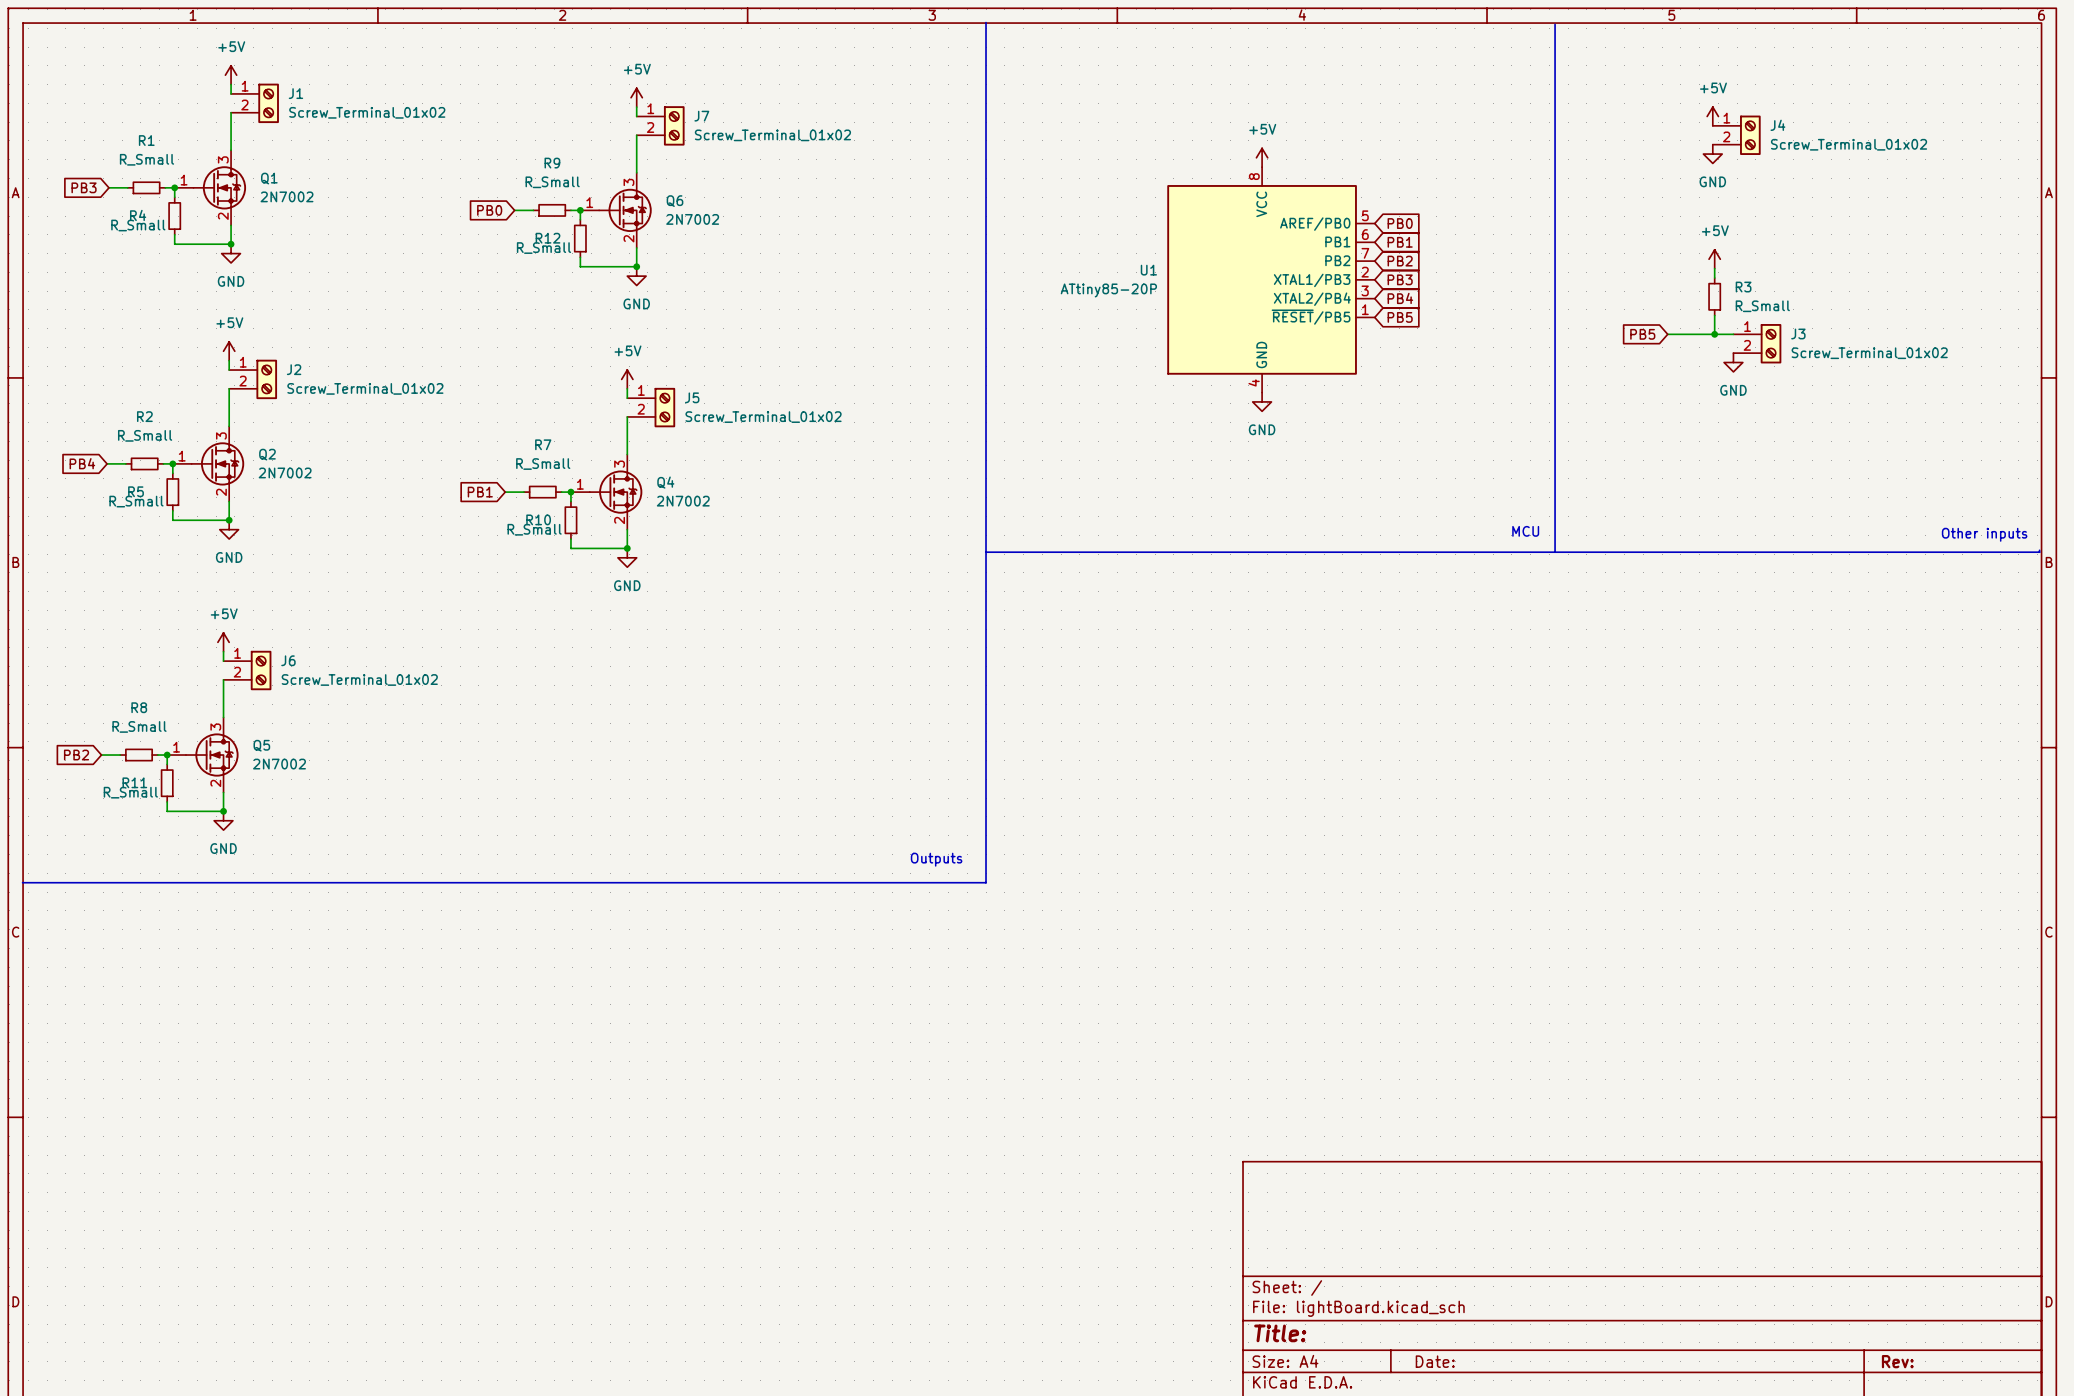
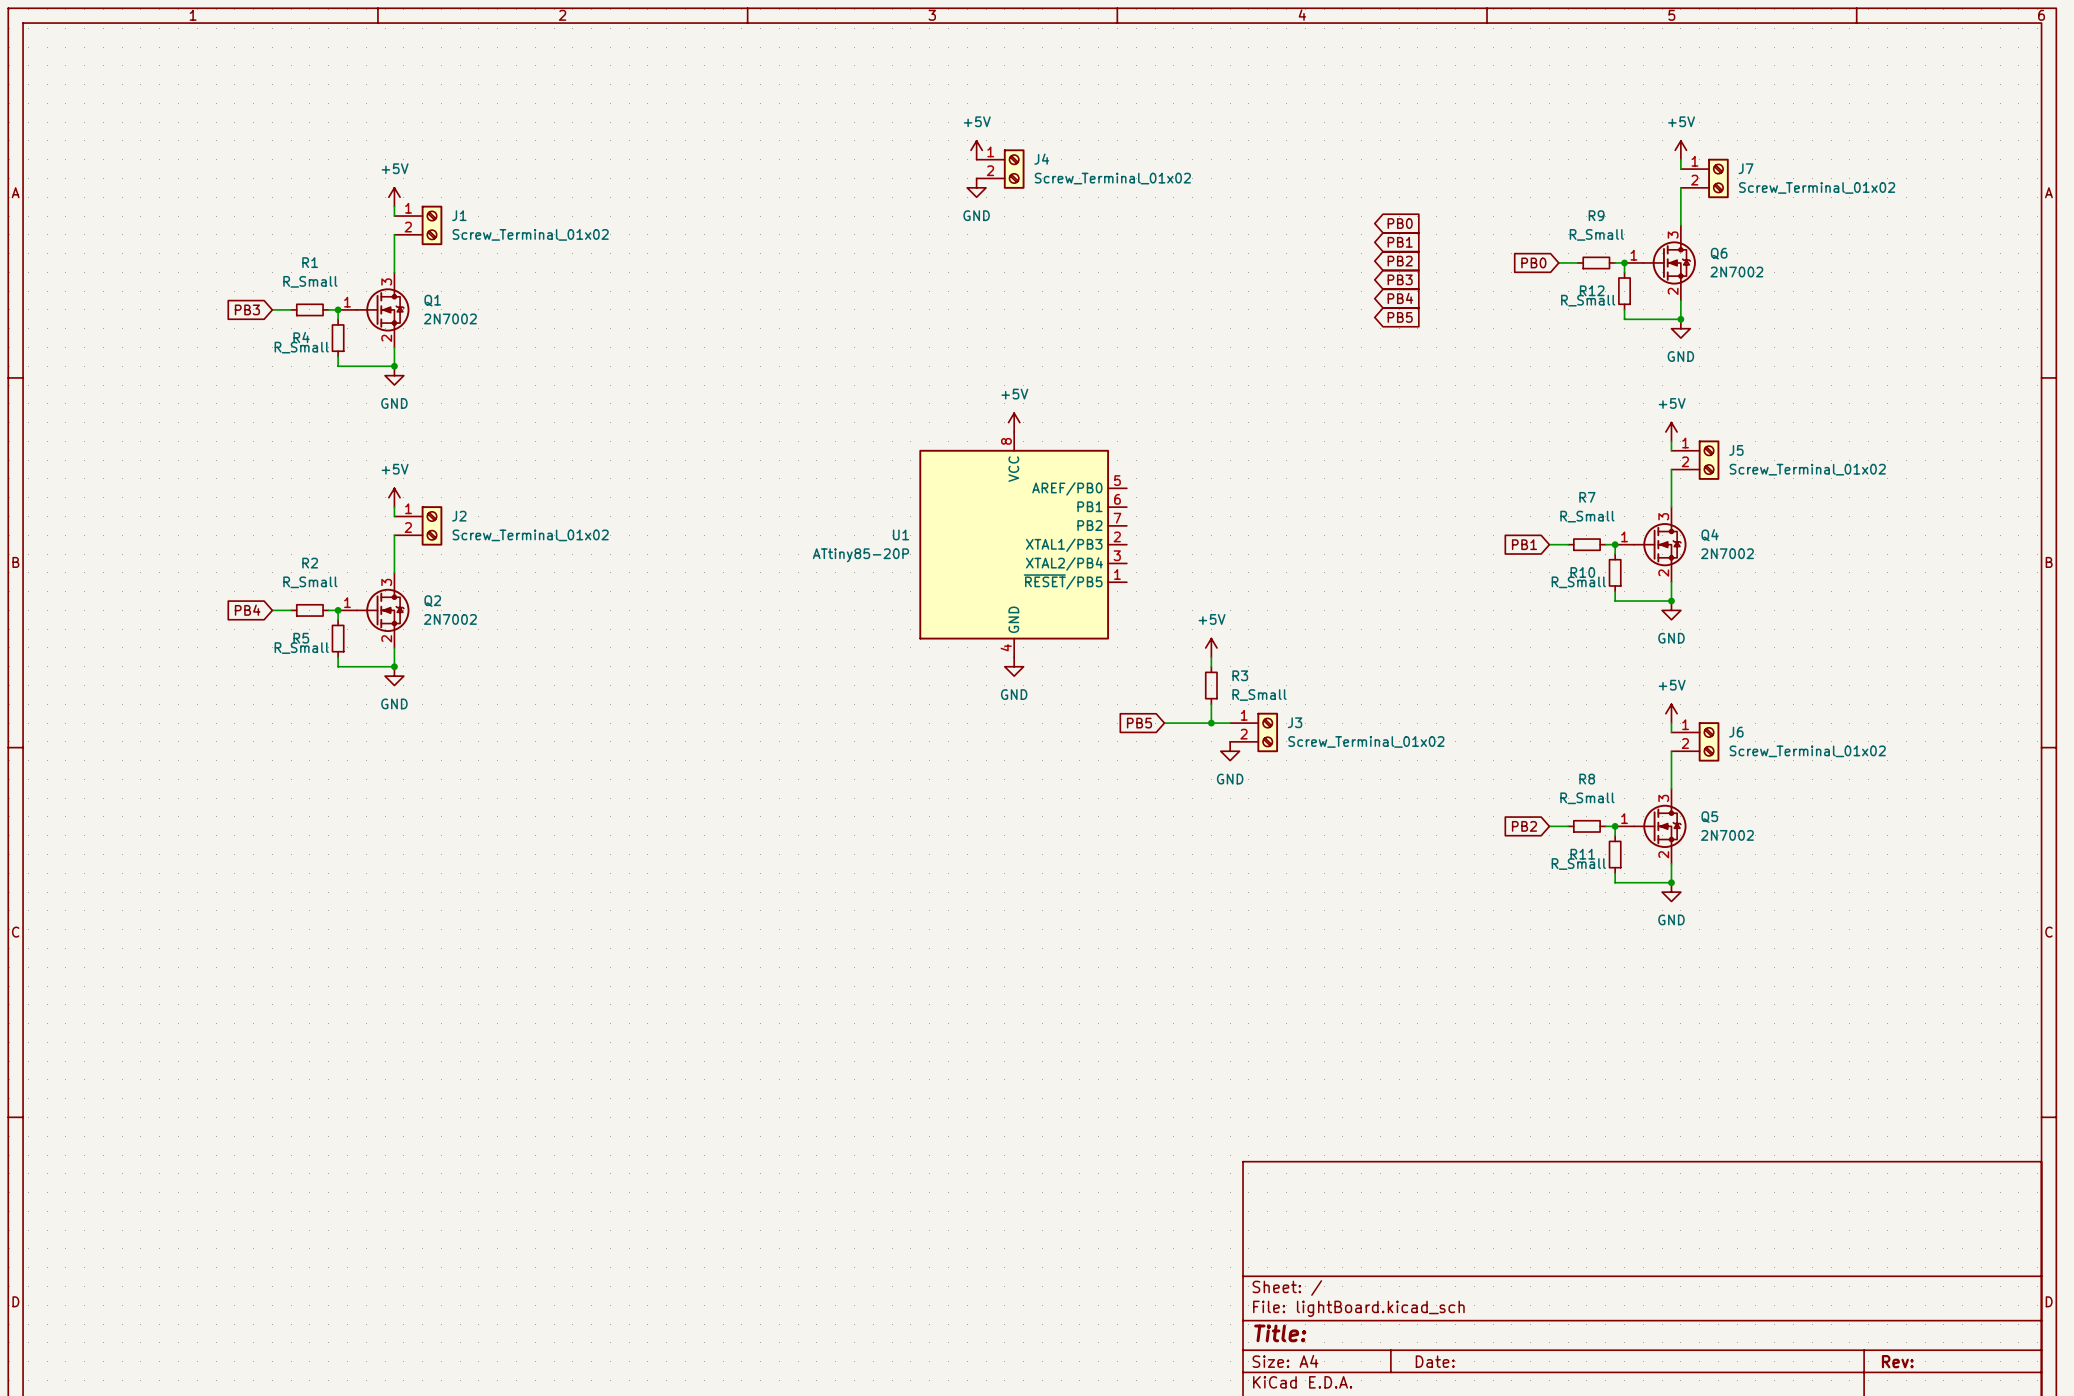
line: (986, 22) (986, 882) (22, 882) -> none
line: (1555, 24) (1555, 552) -> none
power symbol: +5V (231, 75) -> none
wire: (231, 84) (231, 93) -> none
power symbol: +5V (636, 97) -> none
J1 position: (254, 103) -> (418, 225)
wire: (636, 107) (636, 116) -> none
wire: (231, 112) (231, 150) -> none
power symbol position: +5V (1712, 116) -> +5V (1680, 150)
J7 position: (660, 125) -> (1704, 178)
wire: (636, 135) (636, 172) -> none
J4 position: (1736, 135) -> (1000, 169)
power symbol: none -> +5V (976, 150)
power symbol: GND (1712, 154) -> none
power symbol: +5V (1262, 157) -> none
global label: PB3 (84, 187) -> none
wire: (108, 187) (127, 187) -> none
R1 position: (146, 187) -> (309, 309)
wire: (165, 187) (174, 187) (174, 197) -> none
junction: (174, 187) -> none
Q1 position: (210, 187) -> (373, 309)
power symbol: none -> GND (976, 187)
wire: none -> (1680, 187) (1680, 225)
power symbol: none -> +5V (394, 197)
wire: none -> (394, 206) (394, 216)
global label: PB0 (489, 210) -> none
wire: (514, 210) (533, 210) -> none
R9 position: (552, 210) -> (1596, 262)
wire: (570, 210) (580, 210) (580, 219) -> none
junction: (580, 210) -> none
Q6 position: (616, 210) -> (1660, 262)
R4 position: (174, 216) -> (338, 338)
wire: (231, 225) (231, 244) (174, 244) (174, 234) -> none
wire: none -> (394, 234) (394, 272)
R12 position: (580, 238) -> (1624, 291)
junction: (231, 244) -> none
wire: (636, 247) (636, 266) (580, 266) (580, 257) -> none
power symbol: GND (231, 253) -> none
power symbol: +5V (1714, 259) -> none
global label: none -> PB0 (1533, 262)
wire: none -> (1558, 262) (1577, 262)
wire: none -> (1615, 262) (1624, 262) (1624, 272)
junction: none -> (1624, 262)
junction: (636, 266) -> none
wire: (1714, 268) (1714, 278) -> (1680, 159) (1680, 169)
power symbol: GND (636, 276) -> none
U1 position: (1271, 279) -> (1023, 544)
R3 position: (1714, 296) -> (1211, 685)
wire: none -> (1680, 300) (1680, 319) (1624, 319) (1624, 309)
global label: none -> PB3 (247, 309)
wire: none -> (272, 309) (291, 309)
wire: none -> (328, 309) (338, 309) (338, 319)
junction: none -> (338, 309)
wire: (1714, 315) (1714, 334) -> none
global label: PB5 (1642, 334) -> none
wire: (1667, 334) (1733, 334) -> none
junction position: (1714, 334) -> (1680, 319)
J3 position: (1757, 343) -> (1254, 732)
wire: none -> (394, 347) (394, 366) (338, 366) (338, 356)
power symbol: +5V (229, 351) -> none
wire: (229, 360) (229, 370) -> none
power symbol position: GND (1733, 362) -> GND (1680, 328)
junction: none -> (394, 366)
power symbol: none -> GND (394, 375)
J2 position: (253, 379) -> (418, 525)
power symbol: +5V (627, 379) -> none
wire: (229, 388) (229, 426) -> none
wire: (627, 388) (627, 398) -> none
power symbol: GND (1262, 401) -> none
J5 position: (651, 407) -> (1695, 460)
wire: (627, 416) (627, 454) -> none
power symbol: none -> +5V (1014, 422)
power symbol: none -> +5V (1671, 431)
wire: none -> (1671, 441) (1671, 450)
global label: PB4 (82, 463) -> none
wire: (107, 463) (125, 463) -> none
R2 position: (144, 463) -> (309, 610)
wire: (163, 463) (172, 463) (172, 473) -> none
junction: (172, 463) -> none
Q2 position: (208, 463) -> (373, 610)
wire: none -> (1671, 469) (1671, 507)
R5 position: (172, 492) -> (338, 638)
global label: PB1 (480, 492) -> none
wire: (505, 492) (524, 492) -> none
R7 position: (542, 492) -> (1586, 544)
wire: (561, 492) (570, 492) (570, 501) -> none
junction: (570, 492) -> none
Q4 position: (606, 492) -> (1650, 544)
power symbol: none -> +5V (394, 497)
wire: (229, 501) (229, 520) (172, 520) (172, 510) -> none
wire: none -> (394, 507) (394, 516)
junction: (229, 520) -> none
R10 position: (570, 520) -> (1615, 572)
power symbol: GND (229, 529) -> none
wire: (627, 529) (627, 548) (570, 548) (570, 539) -> none
text: MCU (1525, 531) -> none
text: Other inputs (1984, 534) -> none
wire: none -> (394, 535) (394, 572)
global label: none -> PB1 (1524, 544)
wire: none -> (1549, 544) (1568, 544)
wire: none -> (1605, 544) (1615, 544) (1615, 554)
junction: none -> (1615, 544)
junction: (627, 548) -> none
line: (2039, 550) (2039, 552) (986, 552) -> none
power symbol: GND (627, 557) -> none
wire: none -> (1671, 582) (1671, 601) (1615, 601) (1615, 591)
junction: none -> (1671, 601)
global label: none -> PB4 (247, 610)
wire: none -> (272, 610) (291, 610)
wire: none -> (328, 610) (338, 610) (338, 619)
junction: none -> (338, 610)
power symbol: none -> GND (1671, 610)
power symbol: +5V (223, 642) -> none
wire: none -> (394, 647) (394, 666) (338, 666) (338, 657)
power symbol: none -> +5V (1211, 647)
wire: (223, 651) (223, 661) -> none
wire: none -> (1211, 657) (1211, 666)
junction: none -> (394, 666)
power symbol: none -> GND (1014, 666)
J6 position: (247, 670) -> (1695, 741)
power symbol: none -> GND (394, 676)
wire: (223, 679) (223, 717) -> none
wire: none -> (1211, 704) (1211, 723)
power symbol: none -> +5V (1671, 713)
global label: none -> PB5 (1139, 723)
wire: none -> (1164, 723) (1230, 723)
junction: none -> (1211, 723)
wire: none -> (1671, 723) (1671, 732)
power symbol: none -> GND (1230, 751)
wire: none -> (1671, 751) (1671, 788)
global label: PB2 (76, 755) -> none
wire: (101, 755) (120, 755) -> none
R8 position: (139, 755) -> (1586, 826)
wire: (157, 755) (167, 755) (167, 764) -> none
junction: (167, 755) -> none
Q5 position: (202, 755) -> (1650, 826)
R11 position: (167, 783) -> (1615, 854)
wire: (223, 792) (223, 811) (167, 811) (167, 801) -> none
junction: (223, 811) -> none
power symbol: GND (223, 820) -> none
global label: none -> PB2 (1524, 826)
wire: none -> (1549, 826) (1568, 826)
wire: none -> (1605, 826) (1615, 826) (1615, 835)
junction: none -> (1615, 826)
text: Outputs (936, 859) -> none
wire: none -> (1671, 863) (1671, 882) (1615, 882) (1615, 873)
junction: none -> (1671, 882)
power symbol: none -> GND (1671, 892)

